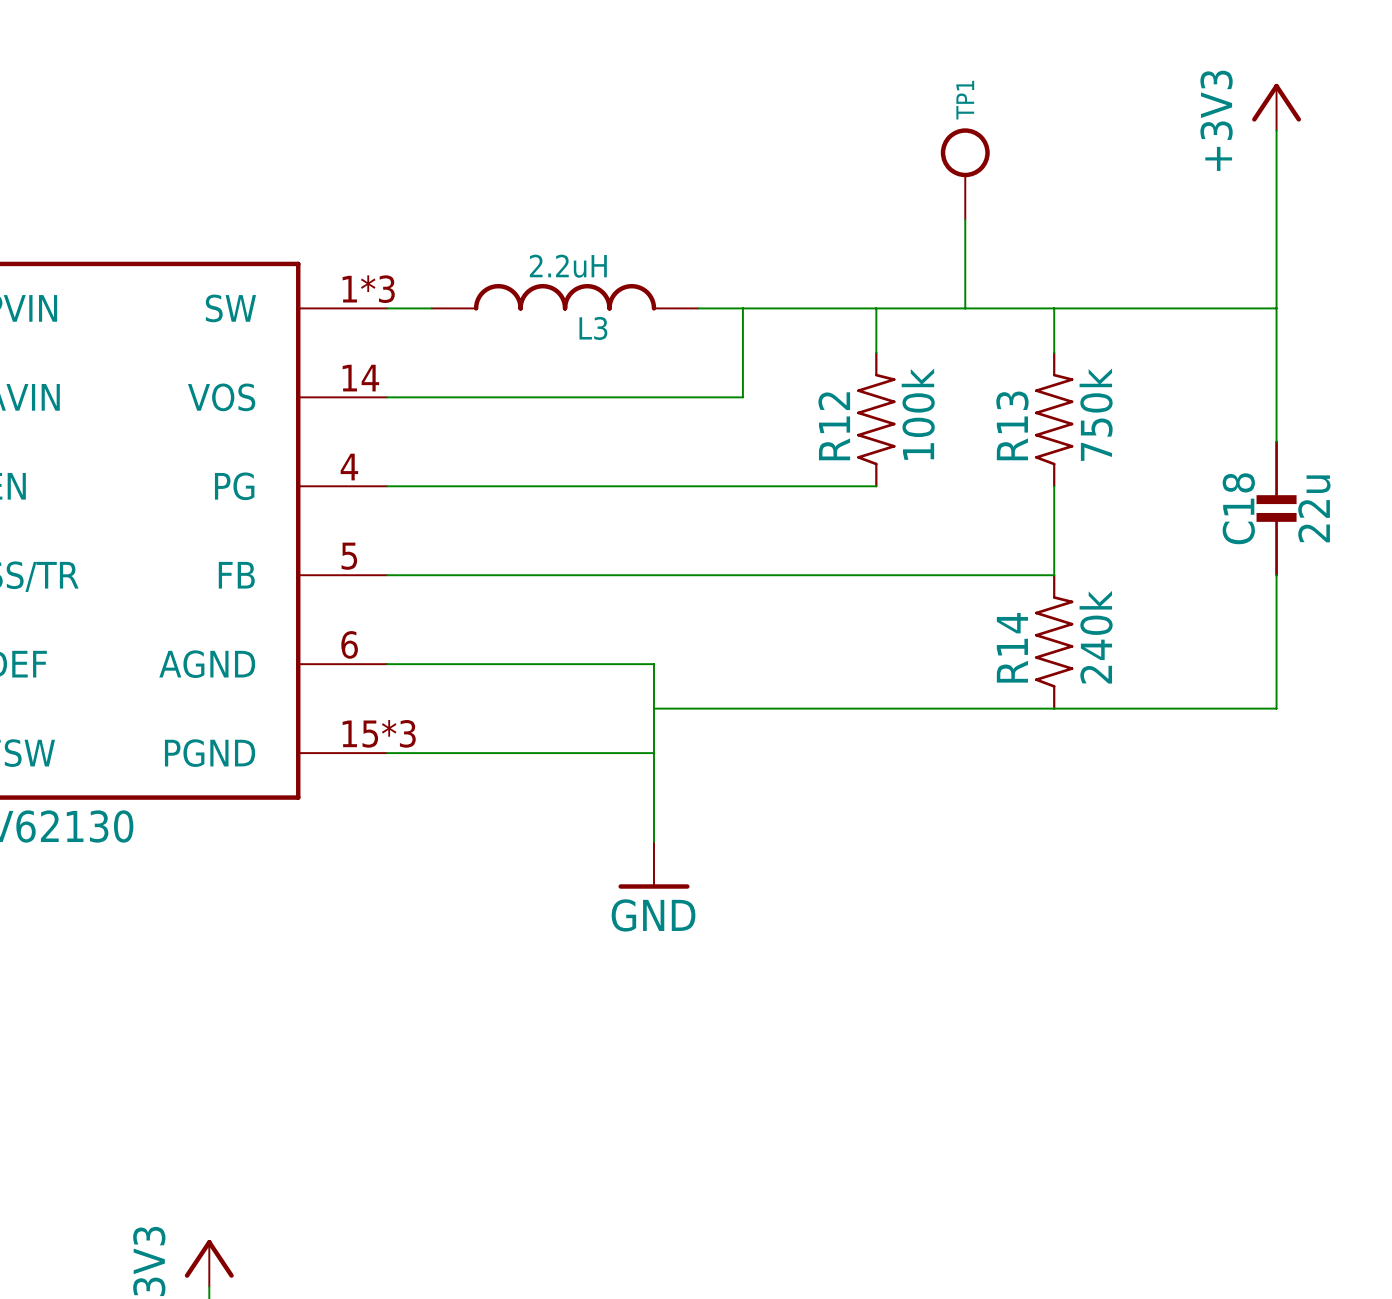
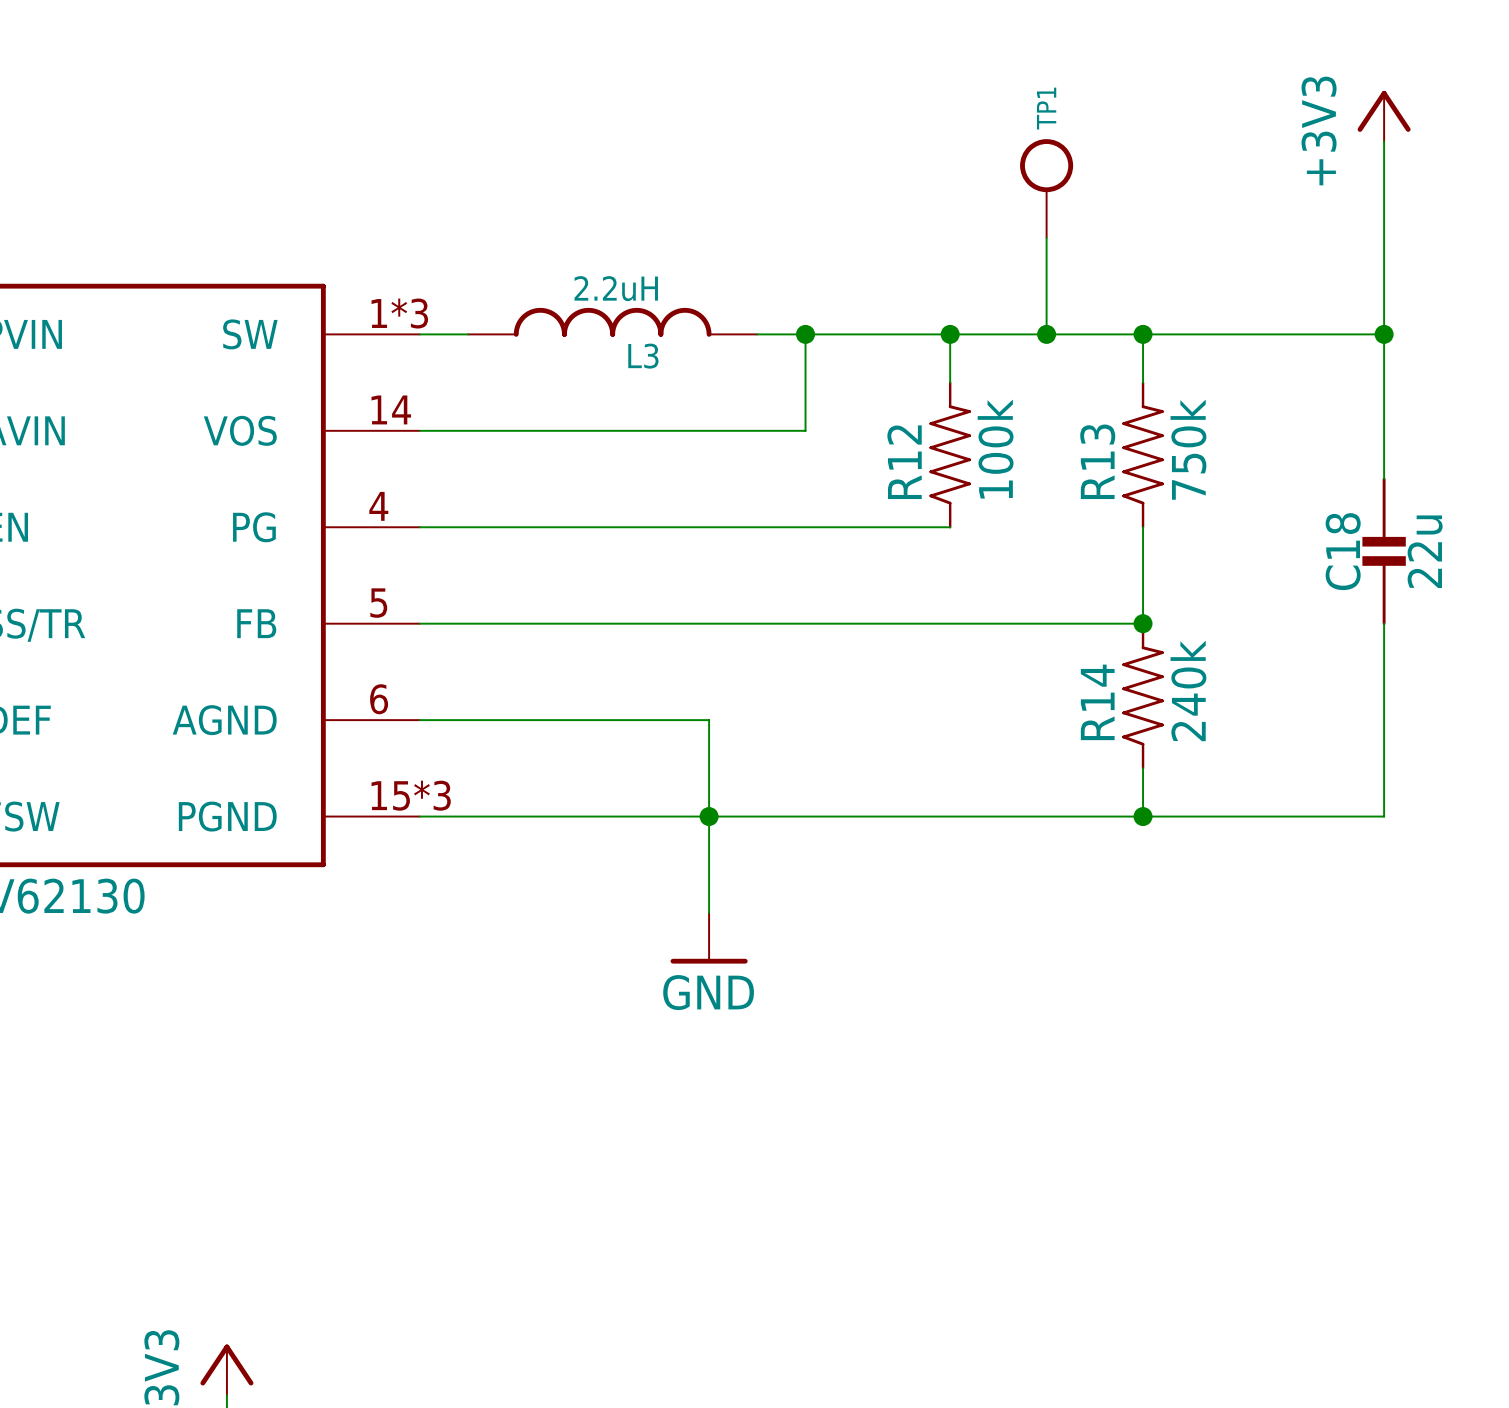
junction: none -> (805, 334)
junction: none -> (950, 334)
junction: none -> (1046, 334)
junction: none -> (1143, 334)
junction: none -> (1384, 334)
junction: none -> (1143, 623)
wire: (653, 708) (1276, 708) -> (709, 816) (1384, 816) (1384, 768)
wire: none -> (1143, 768) (1143, 816)
junction: none -> (709, 816)
junction: none -> (1143, 816)

